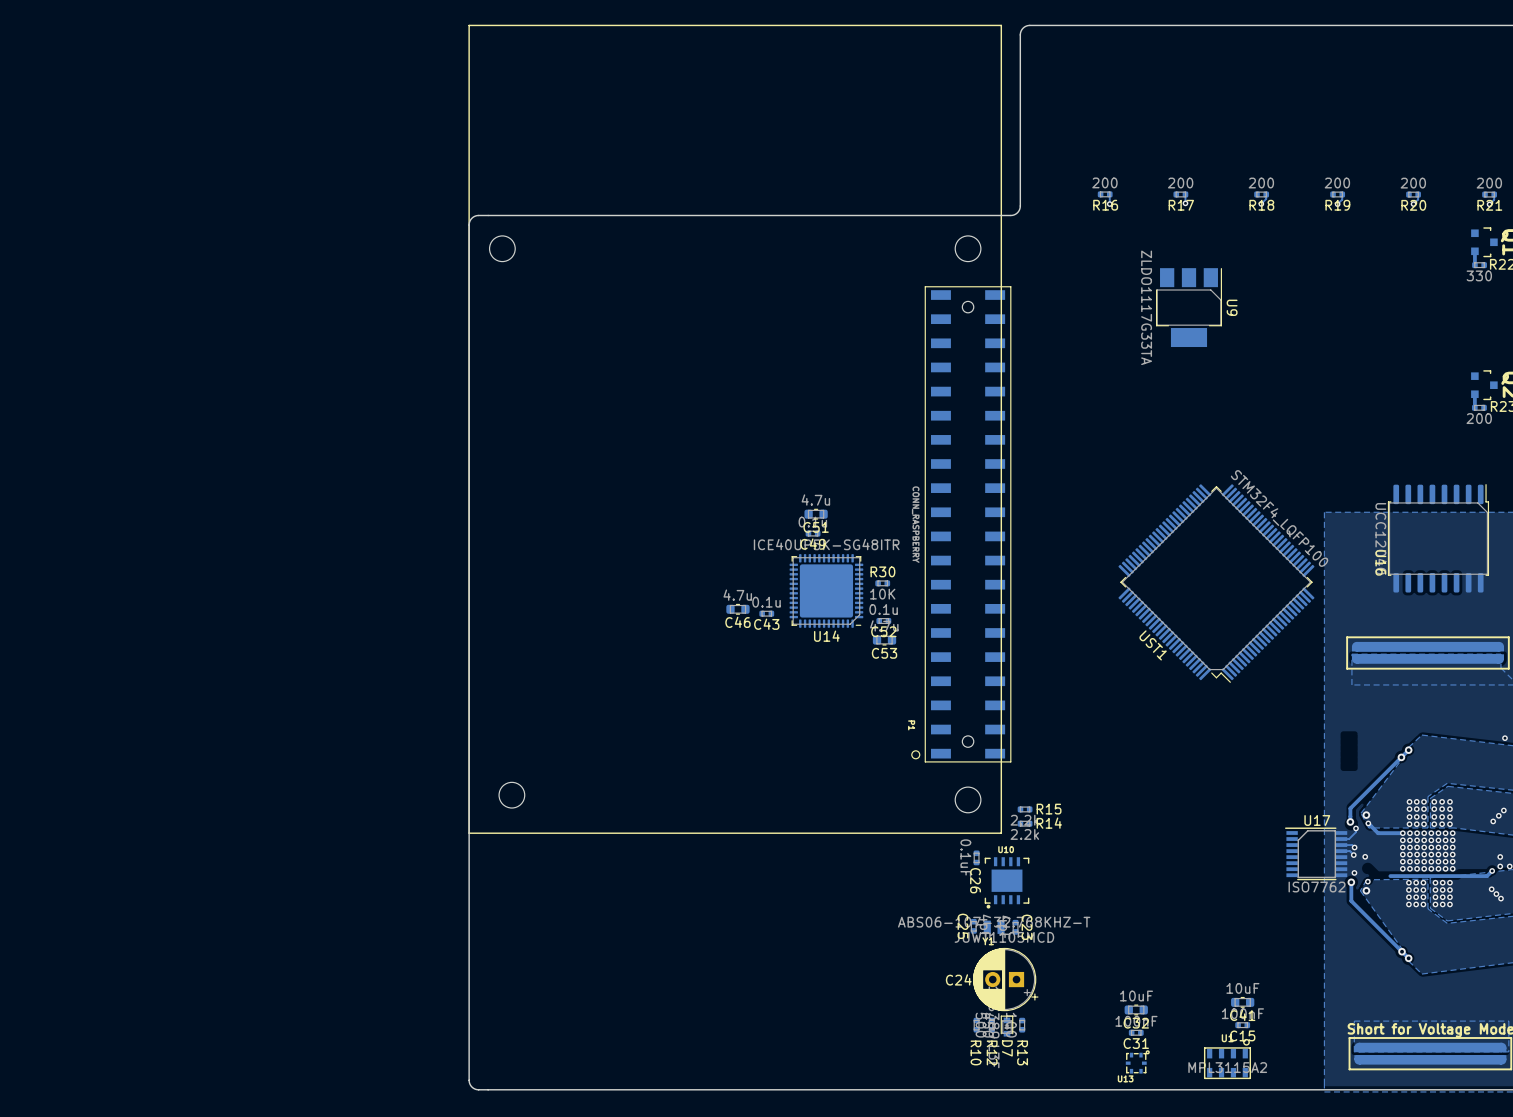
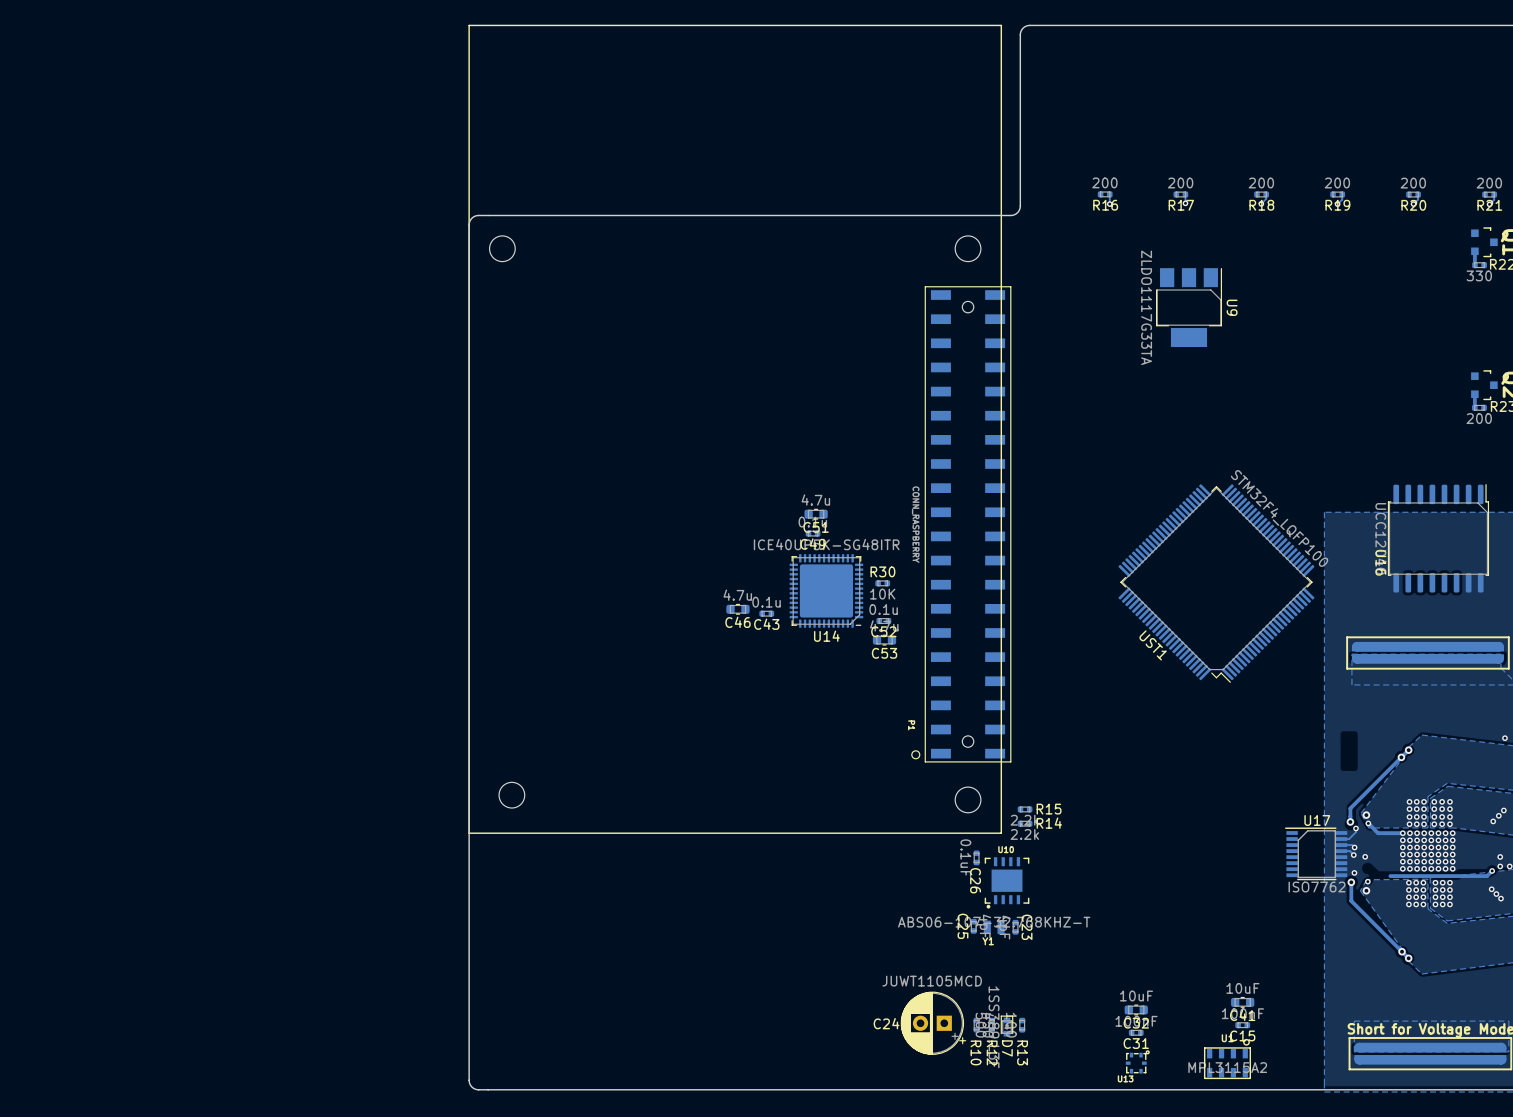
C24 position: (1005, 979) -> (933, 1023)

